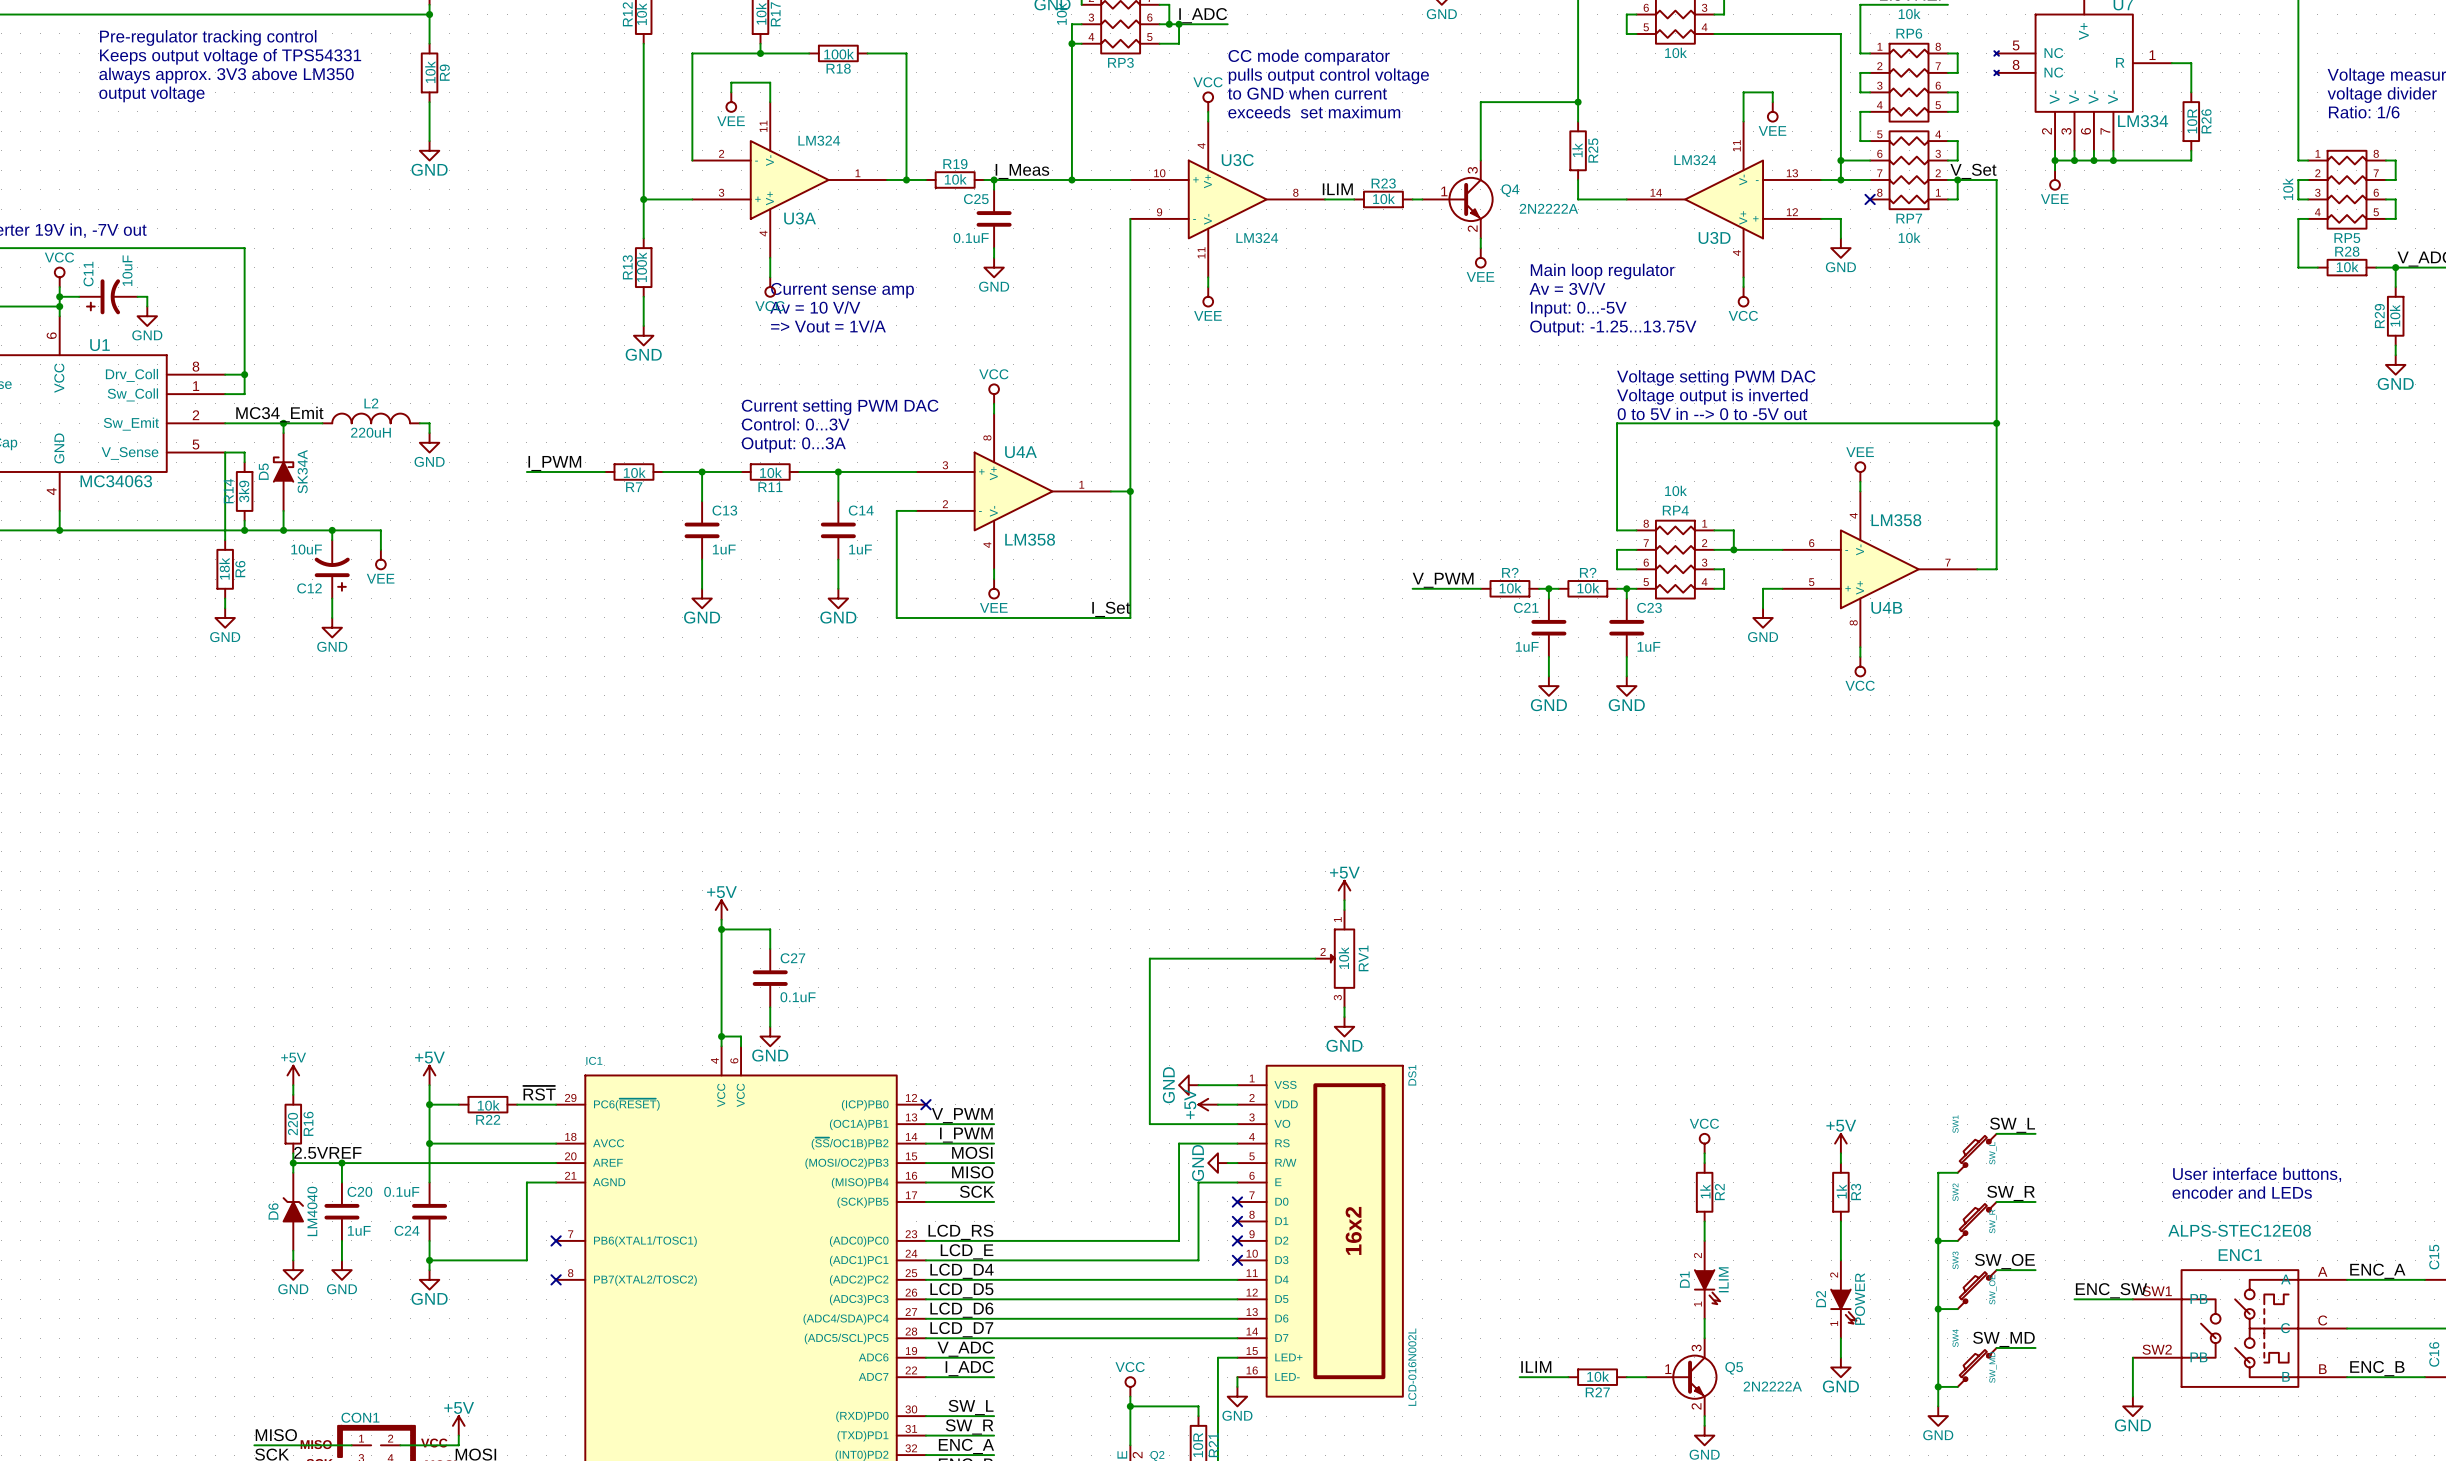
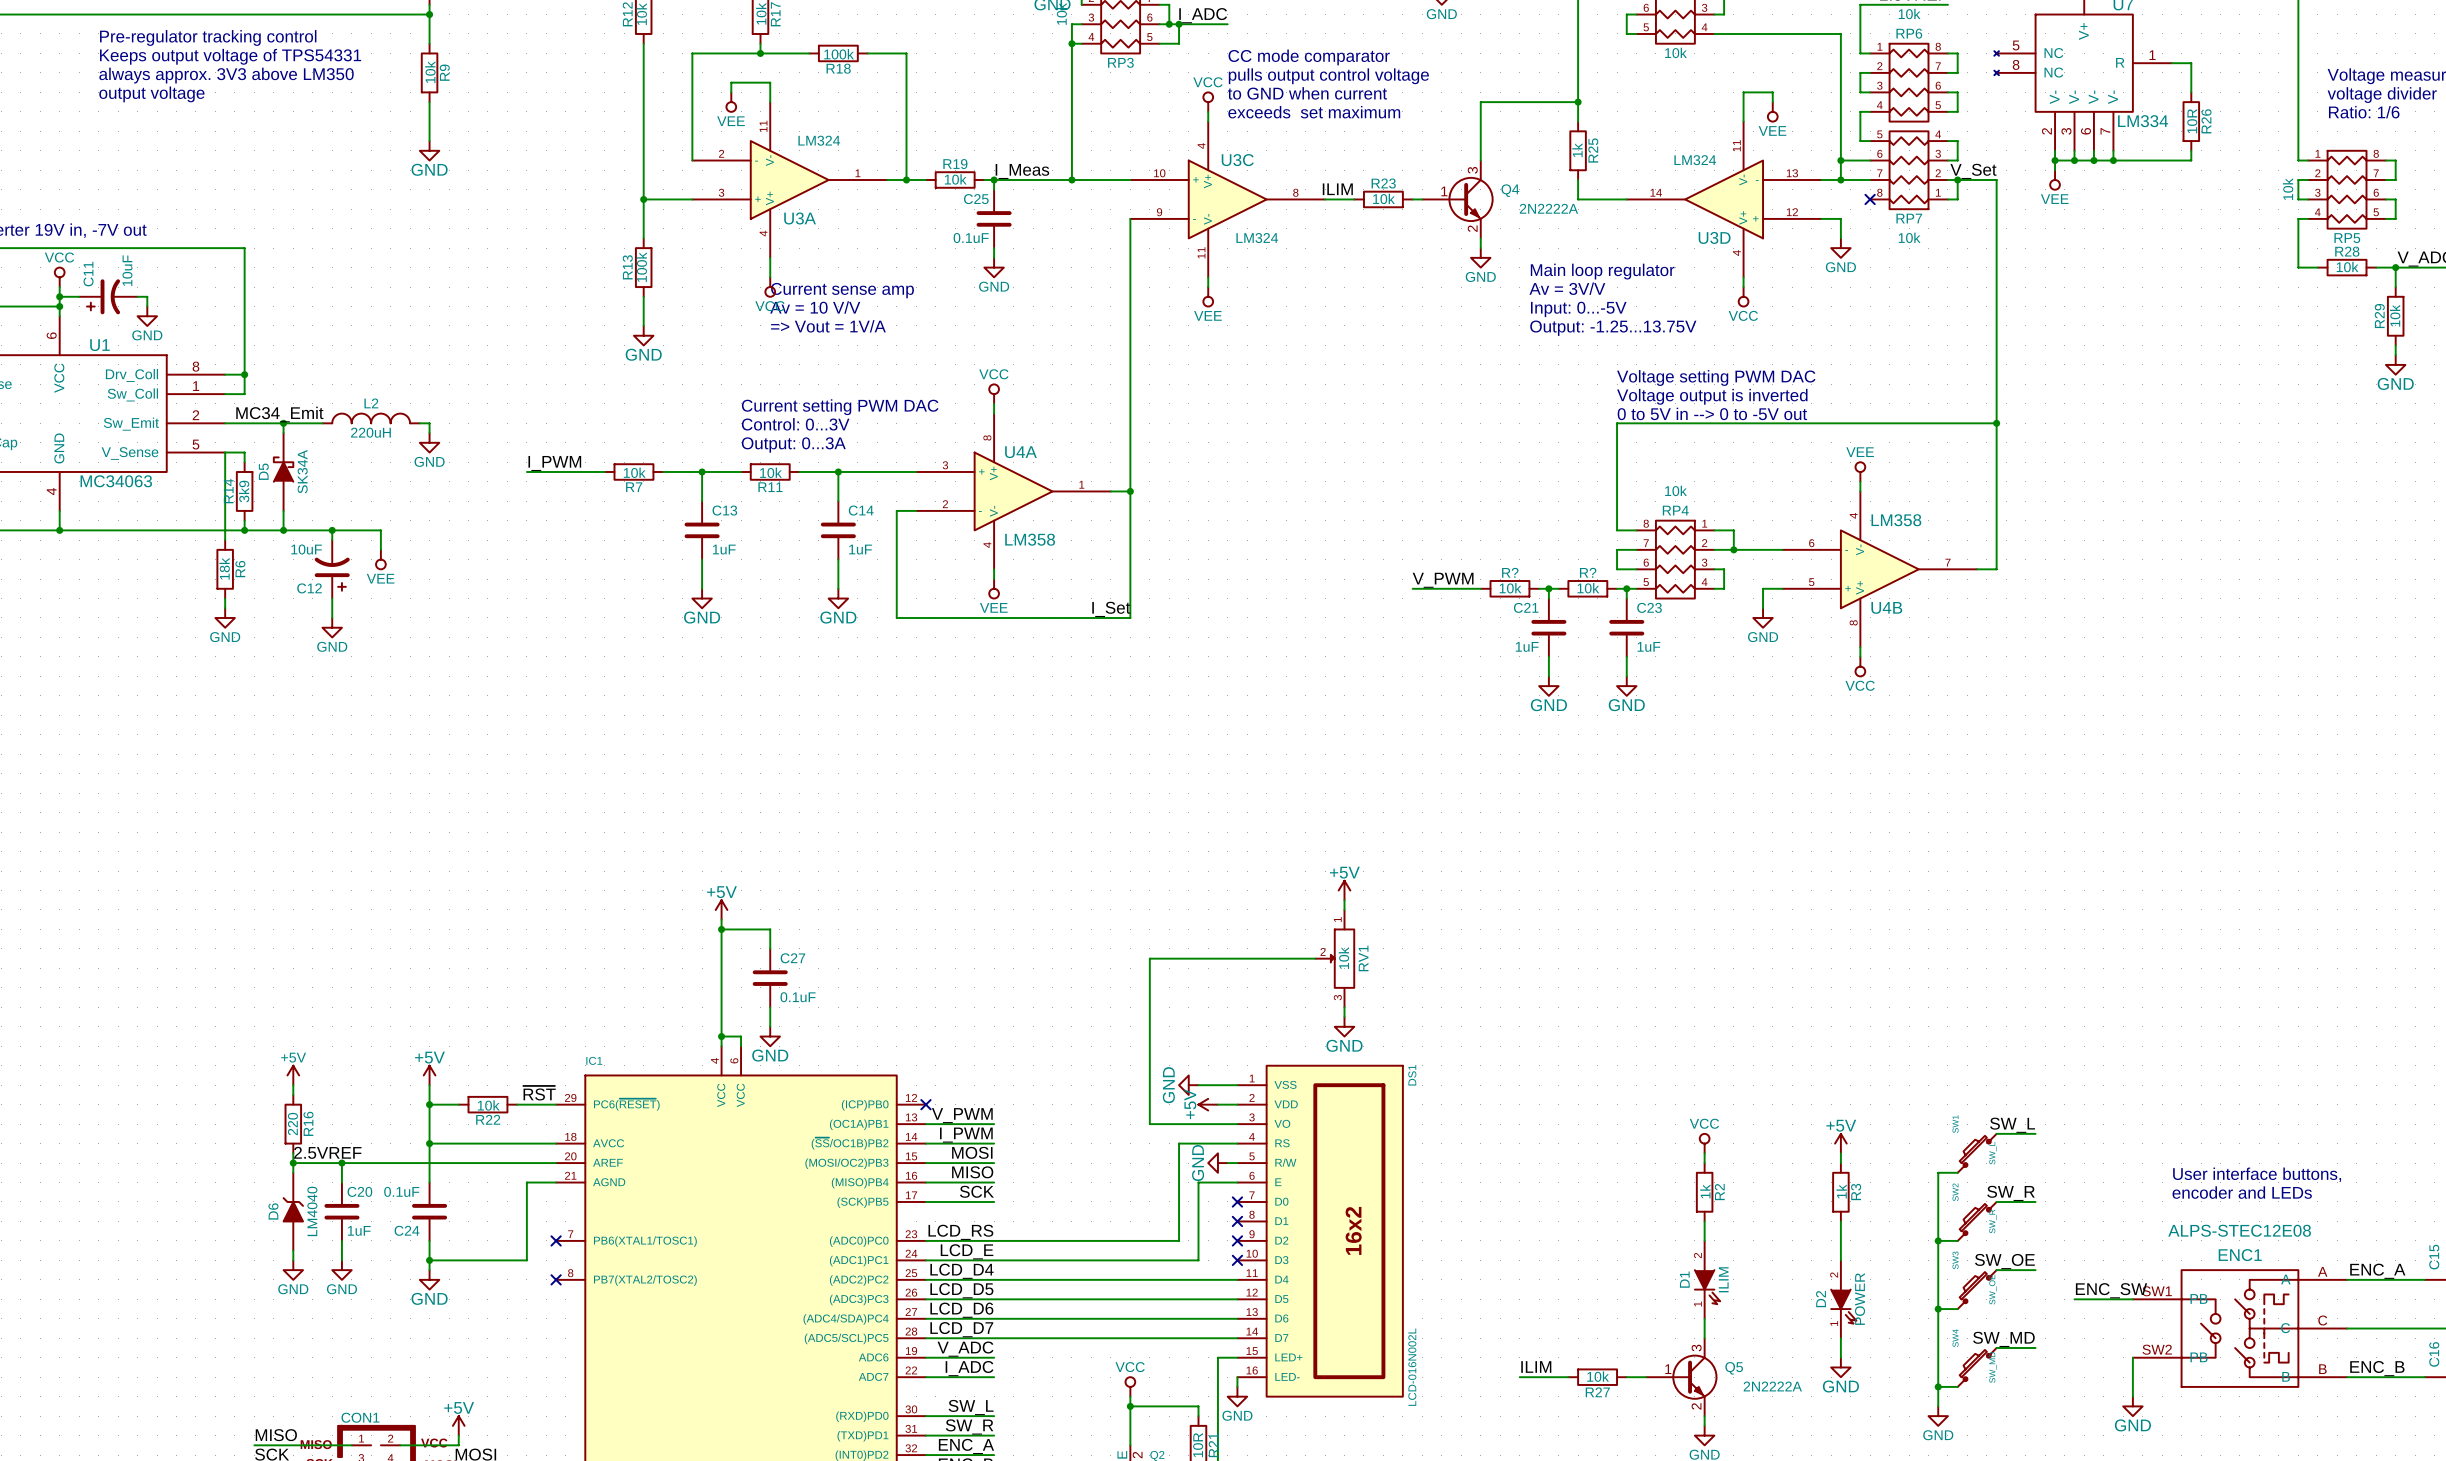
power symbol: VEE (1480, 257) -> GND (1480, 257)

